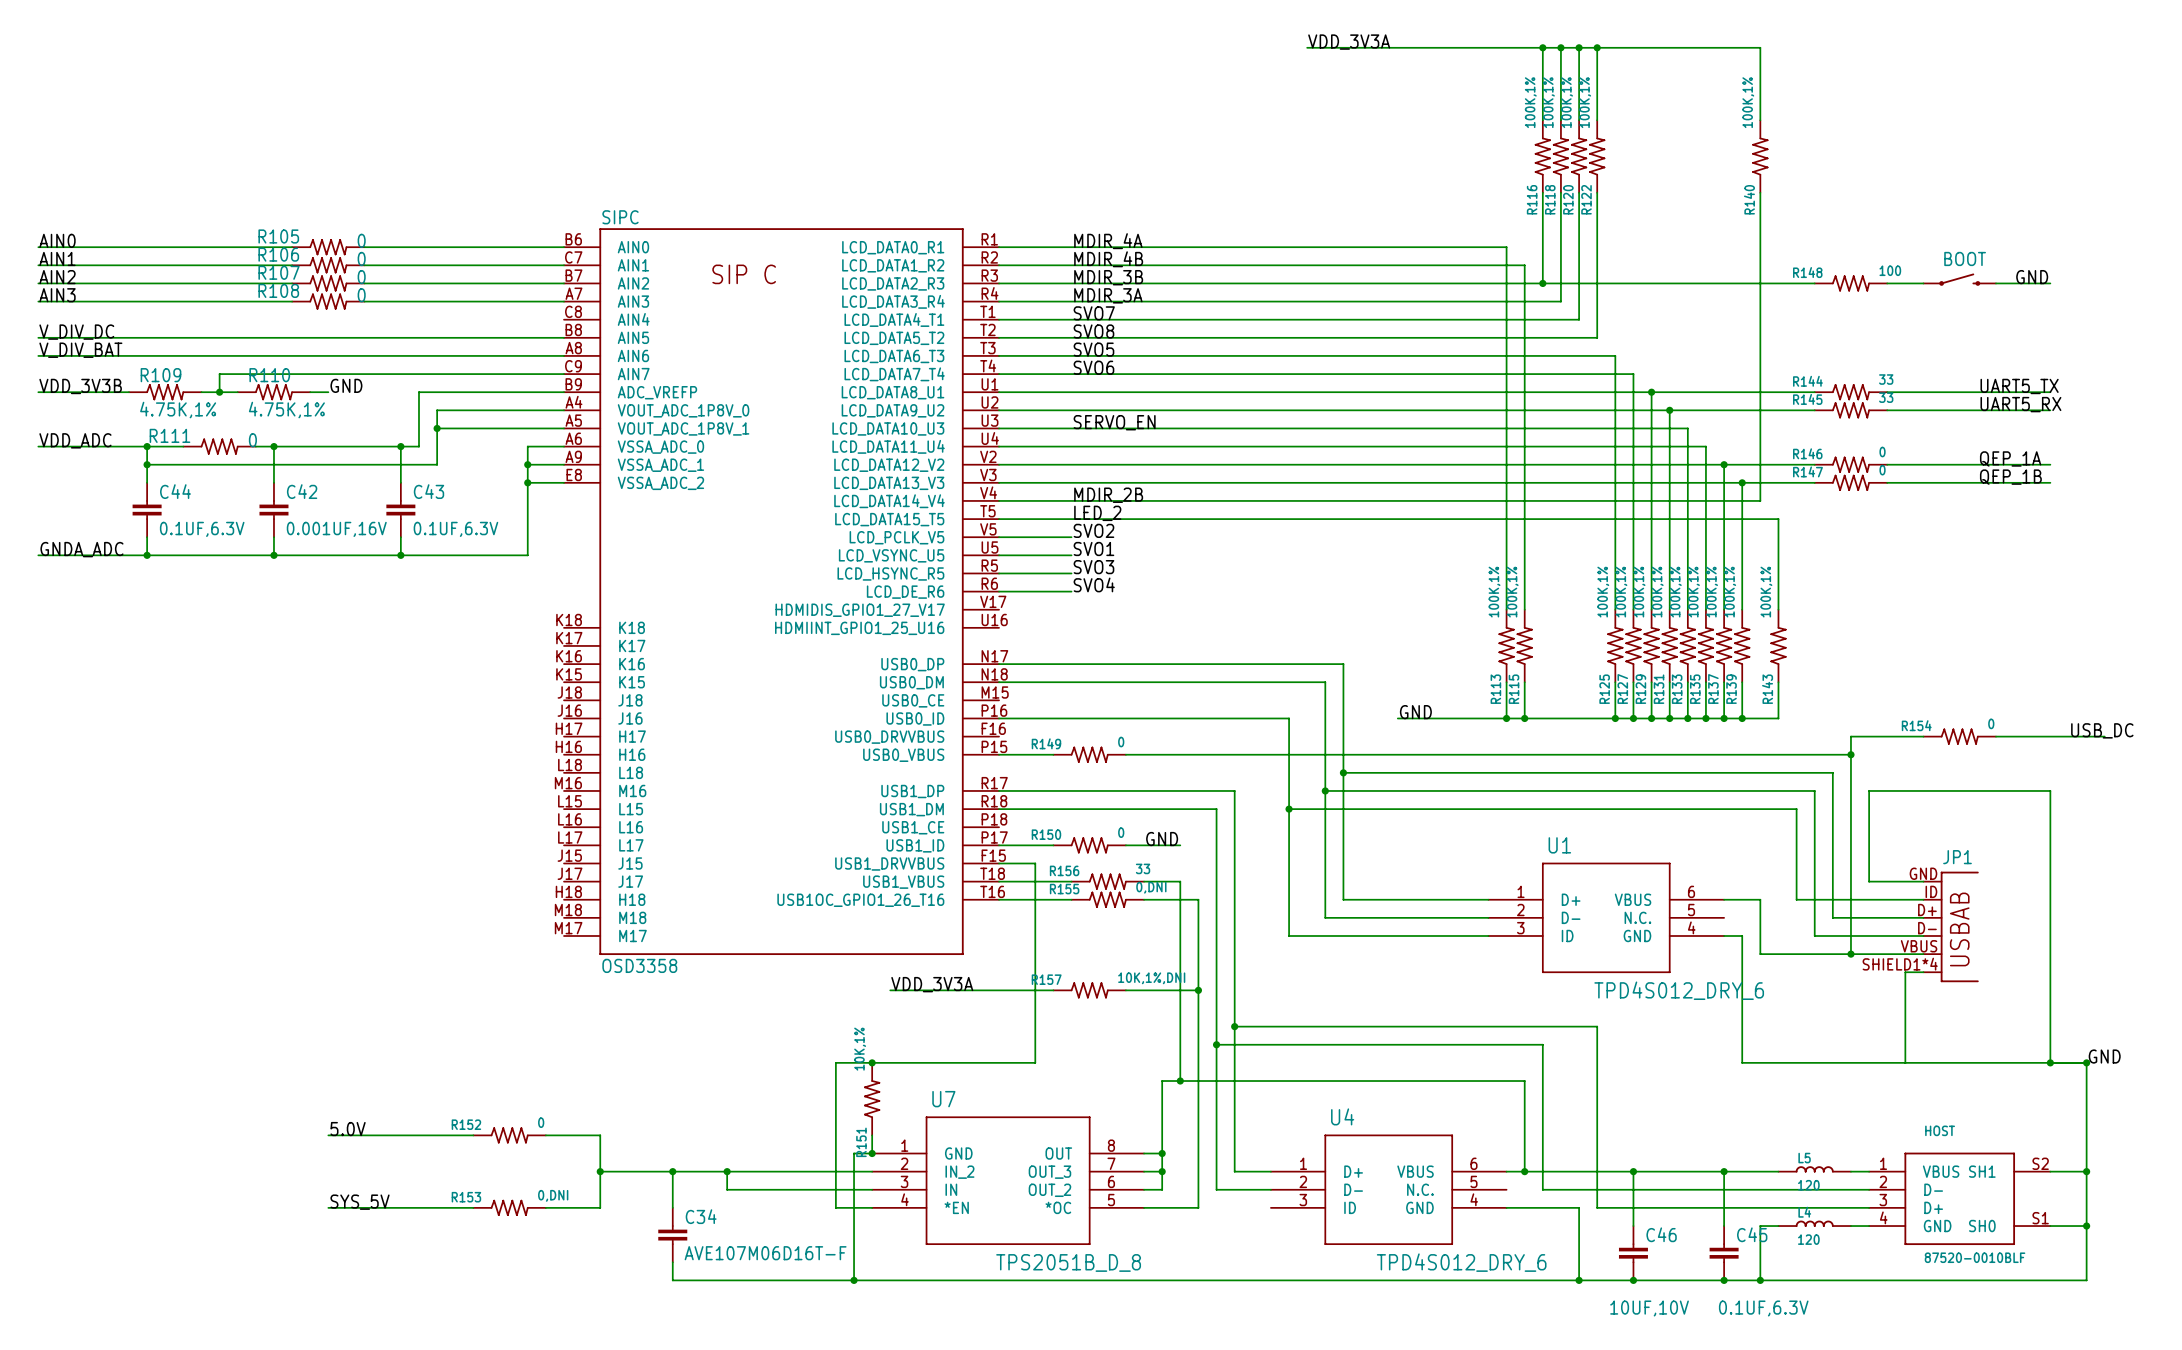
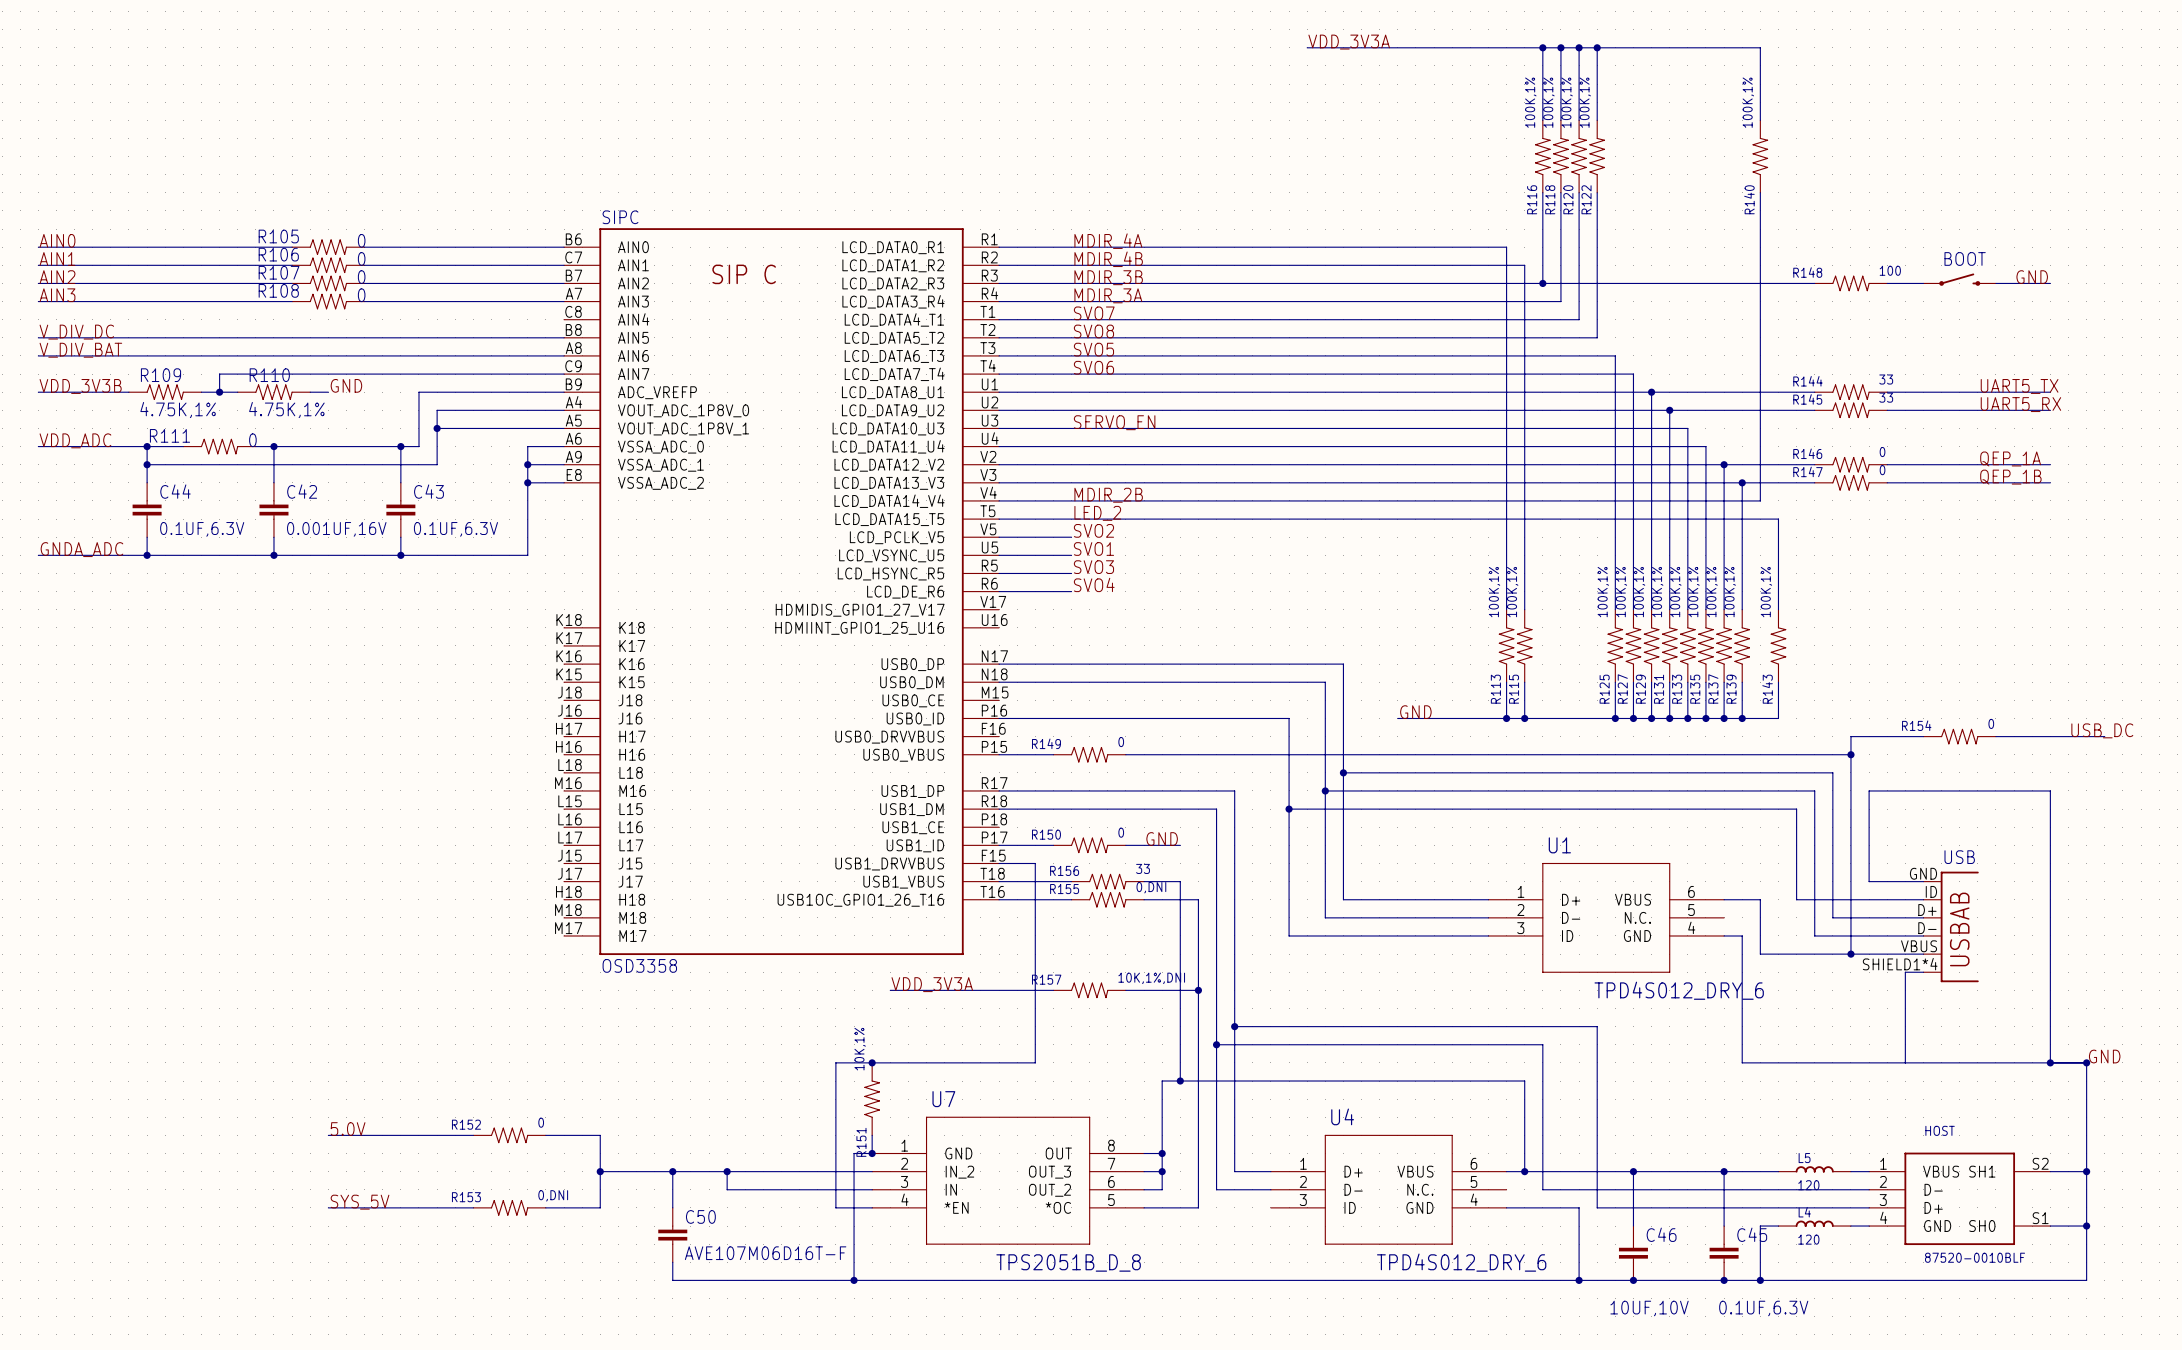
JP1 name: JP1 (1957, 857) -> USB (1959, 857)
C50 name: none -> C50 (700, 1216)
C50 text: C34 (701, 1216) -> none

